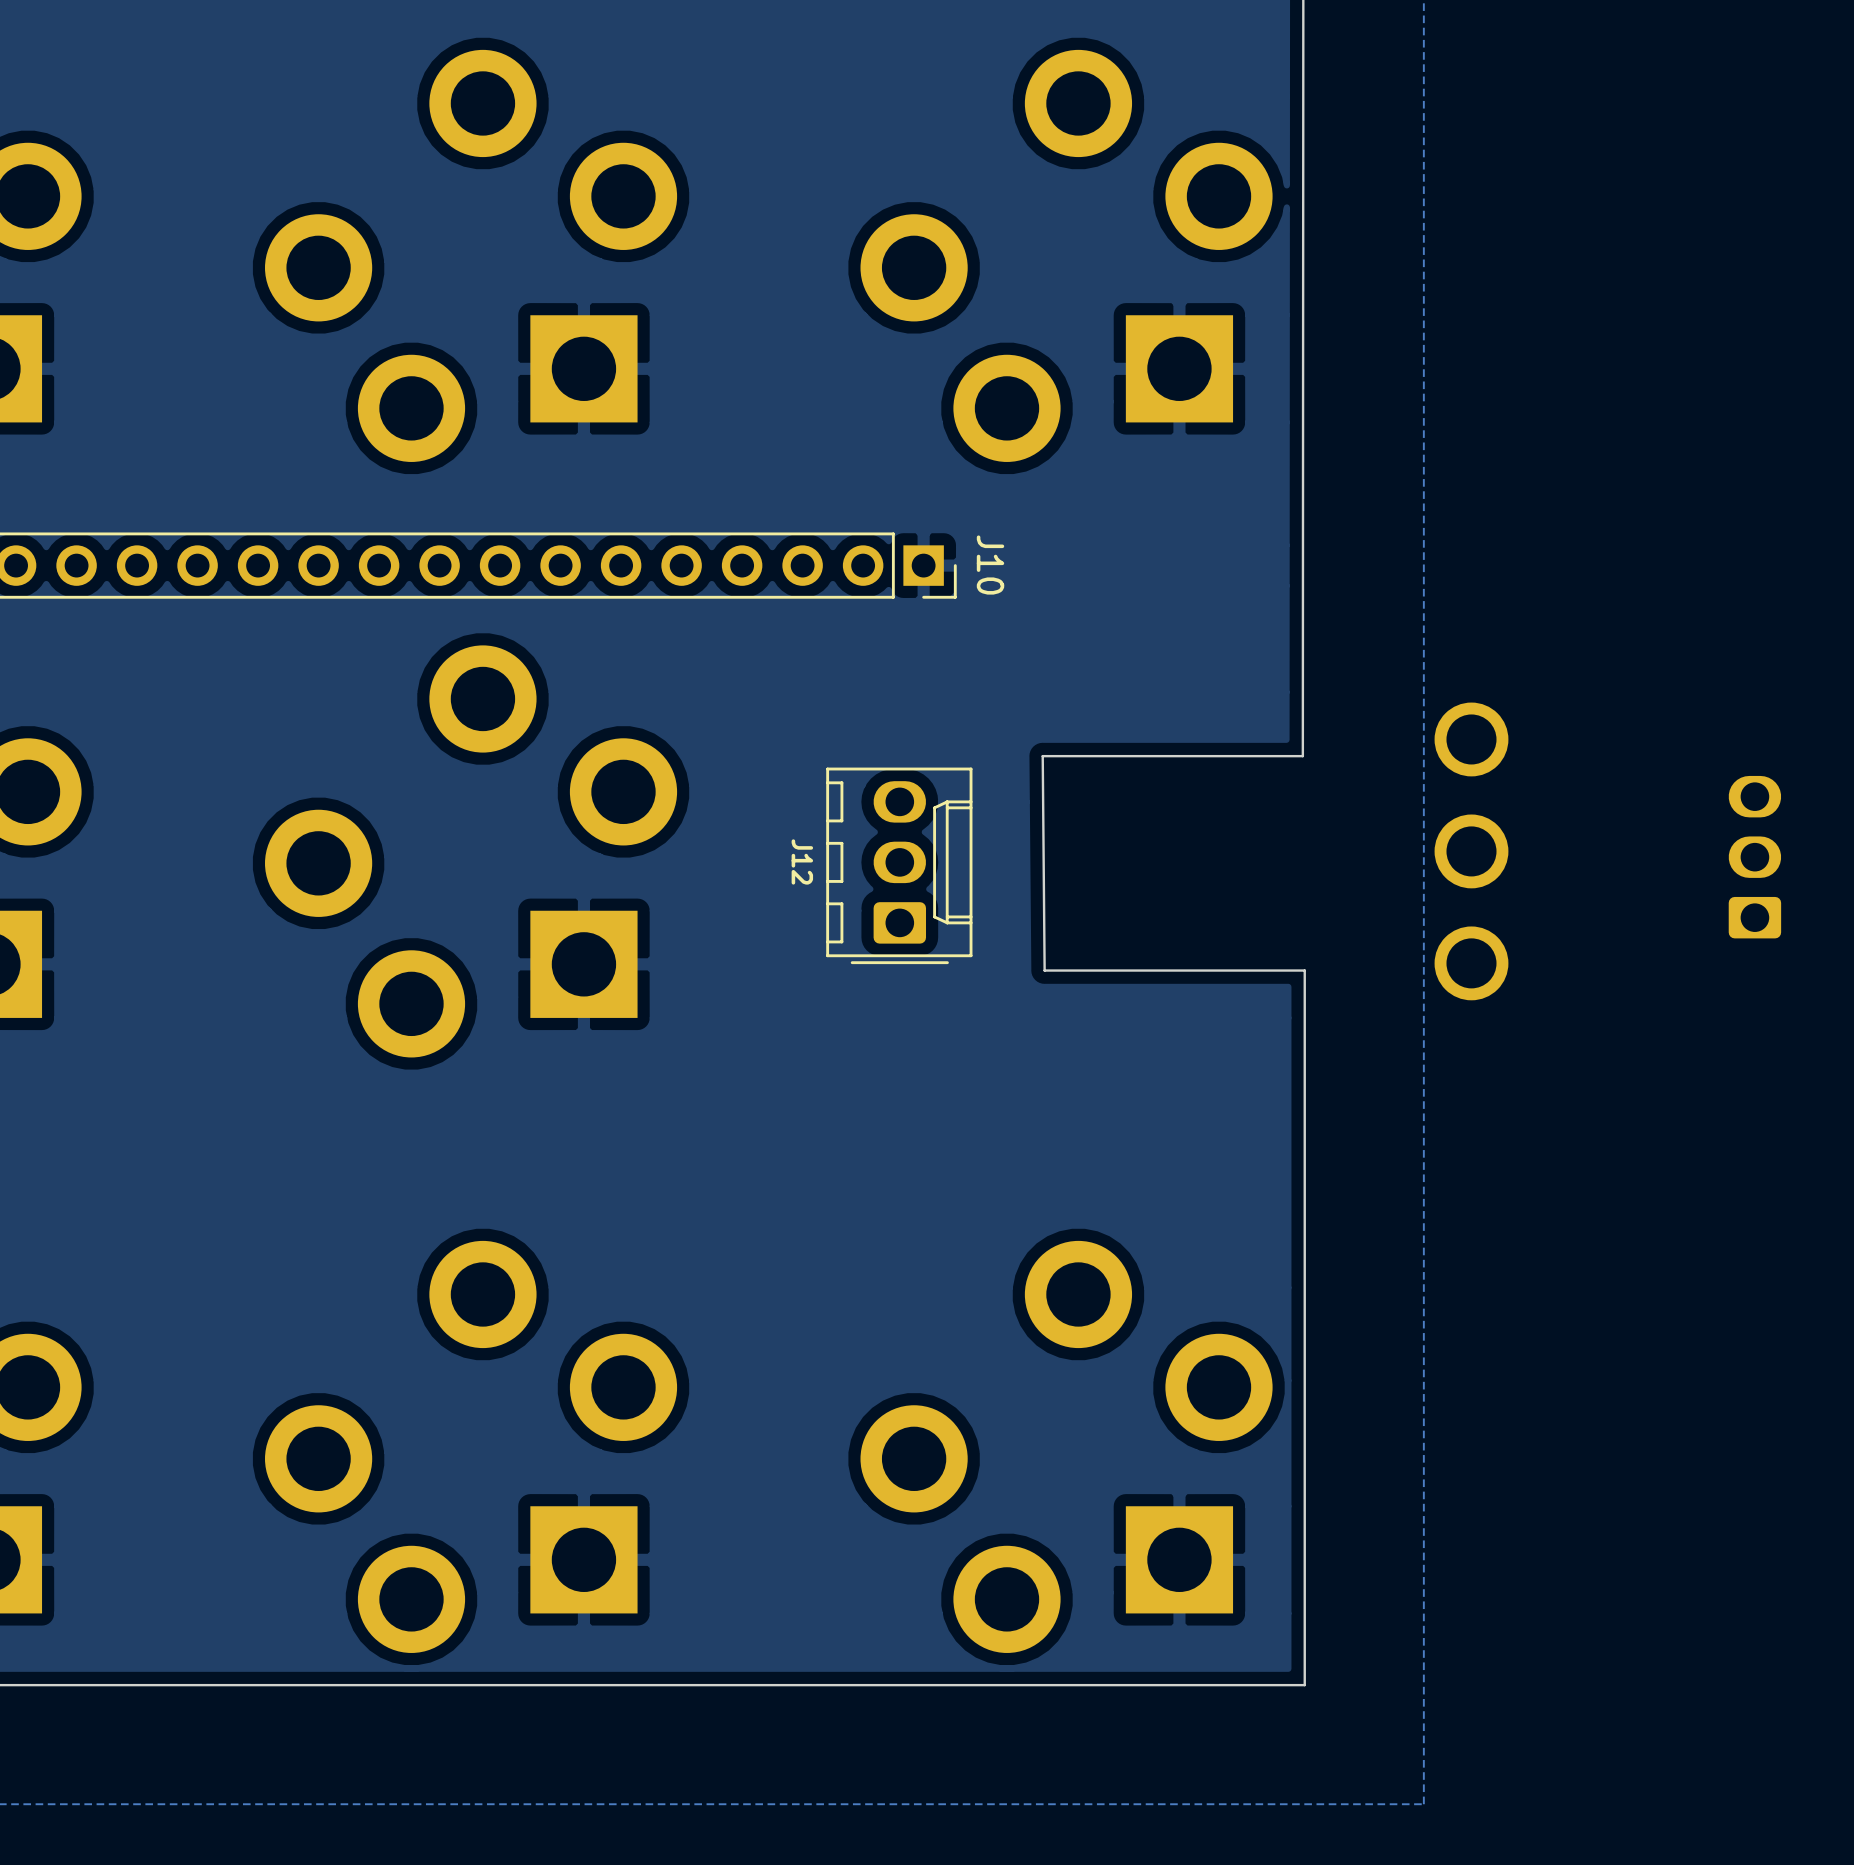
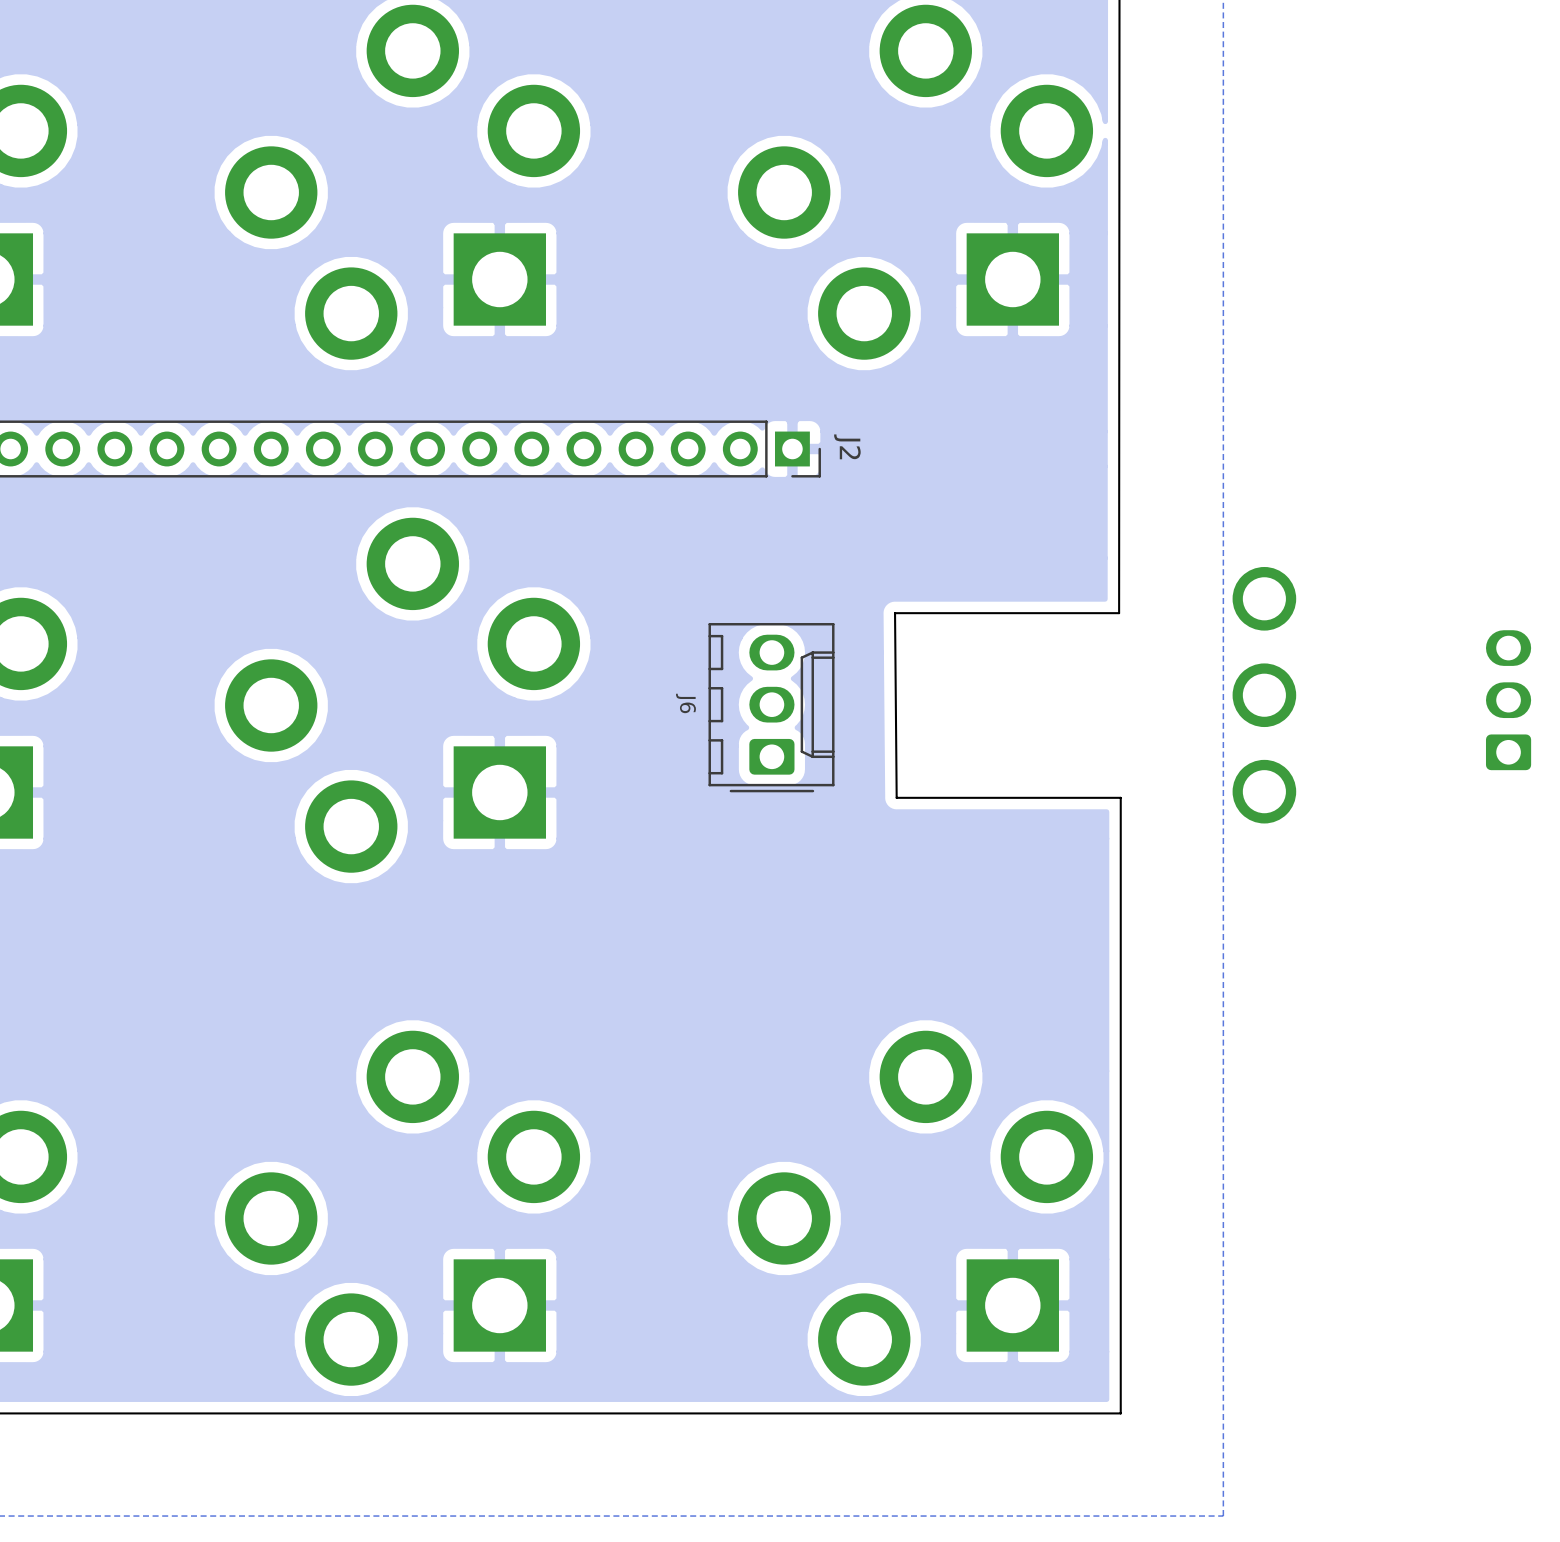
J10 name: J10 (990, 565) -> J2 (847, 446)
J12 name: J12 (802, 861) -> J6 (685, 703)

